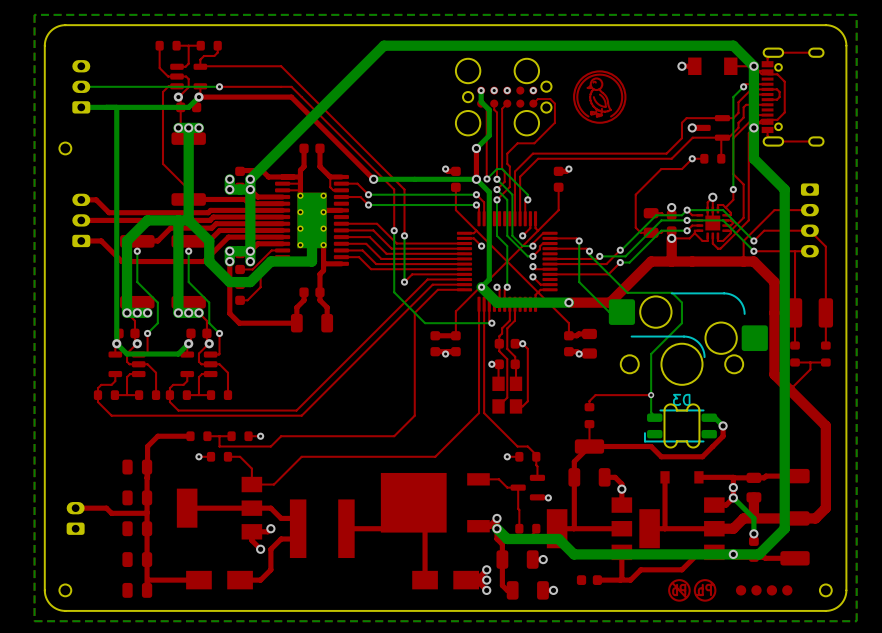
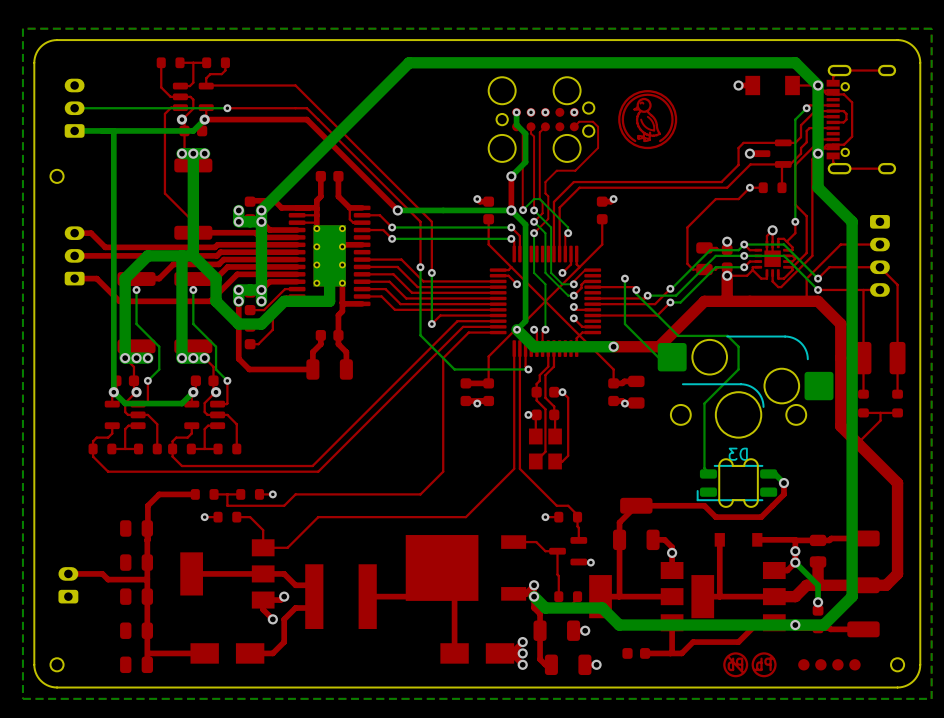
top track: (550, 238) (576, 238) (579, 240) -> none
top track: (651, 395) (595, 395) (589, 401) (589, 407) -> none
via: (651, 395) -> none
part: (589, 415) -> none
top track: (589, 424) (589, 446) -> none

